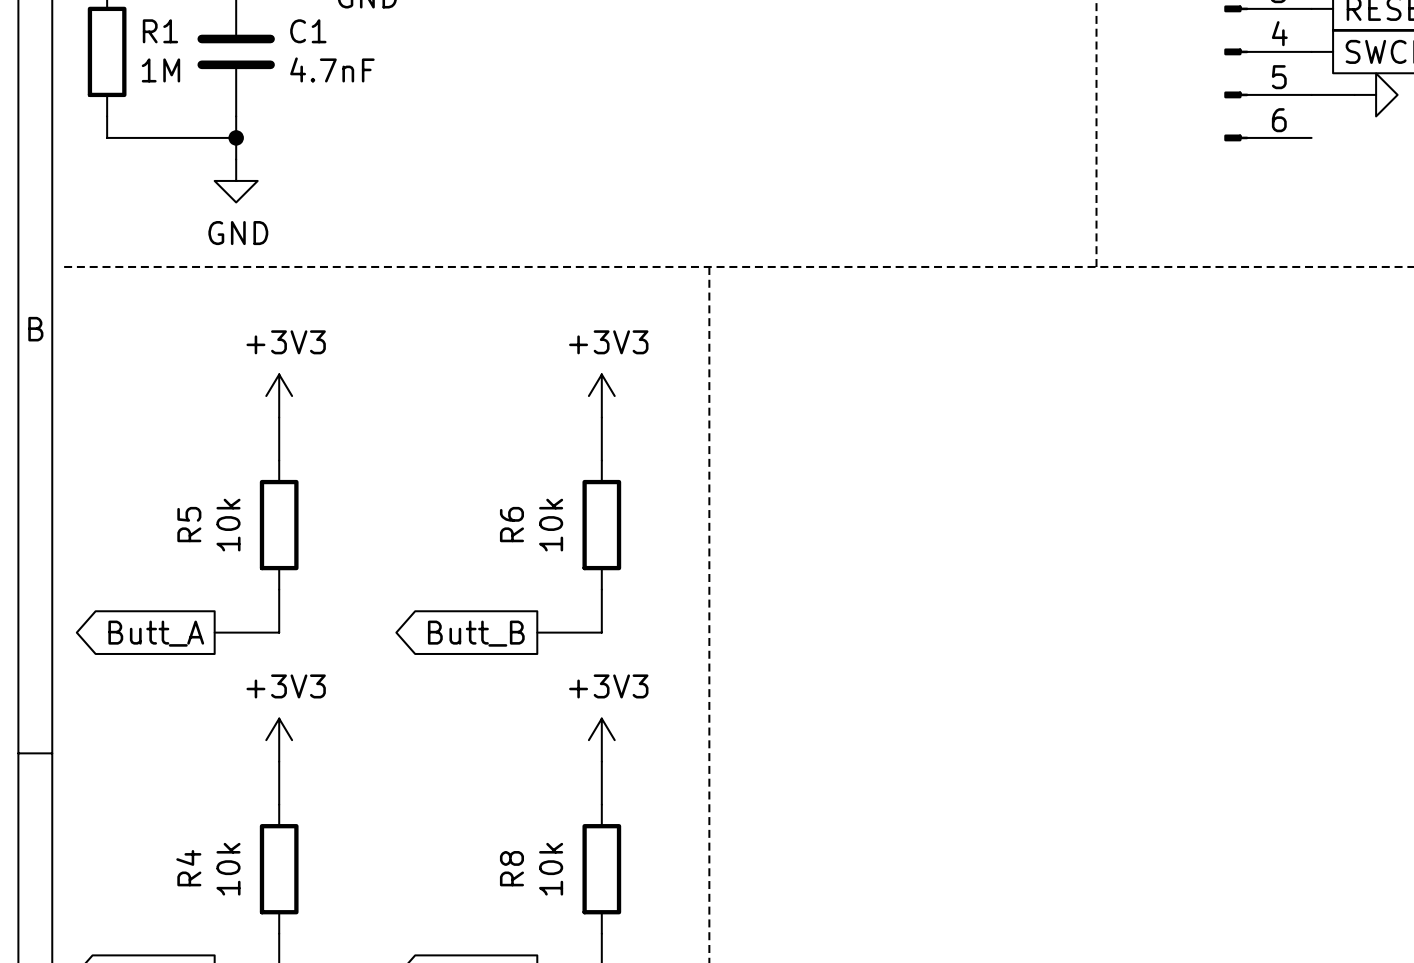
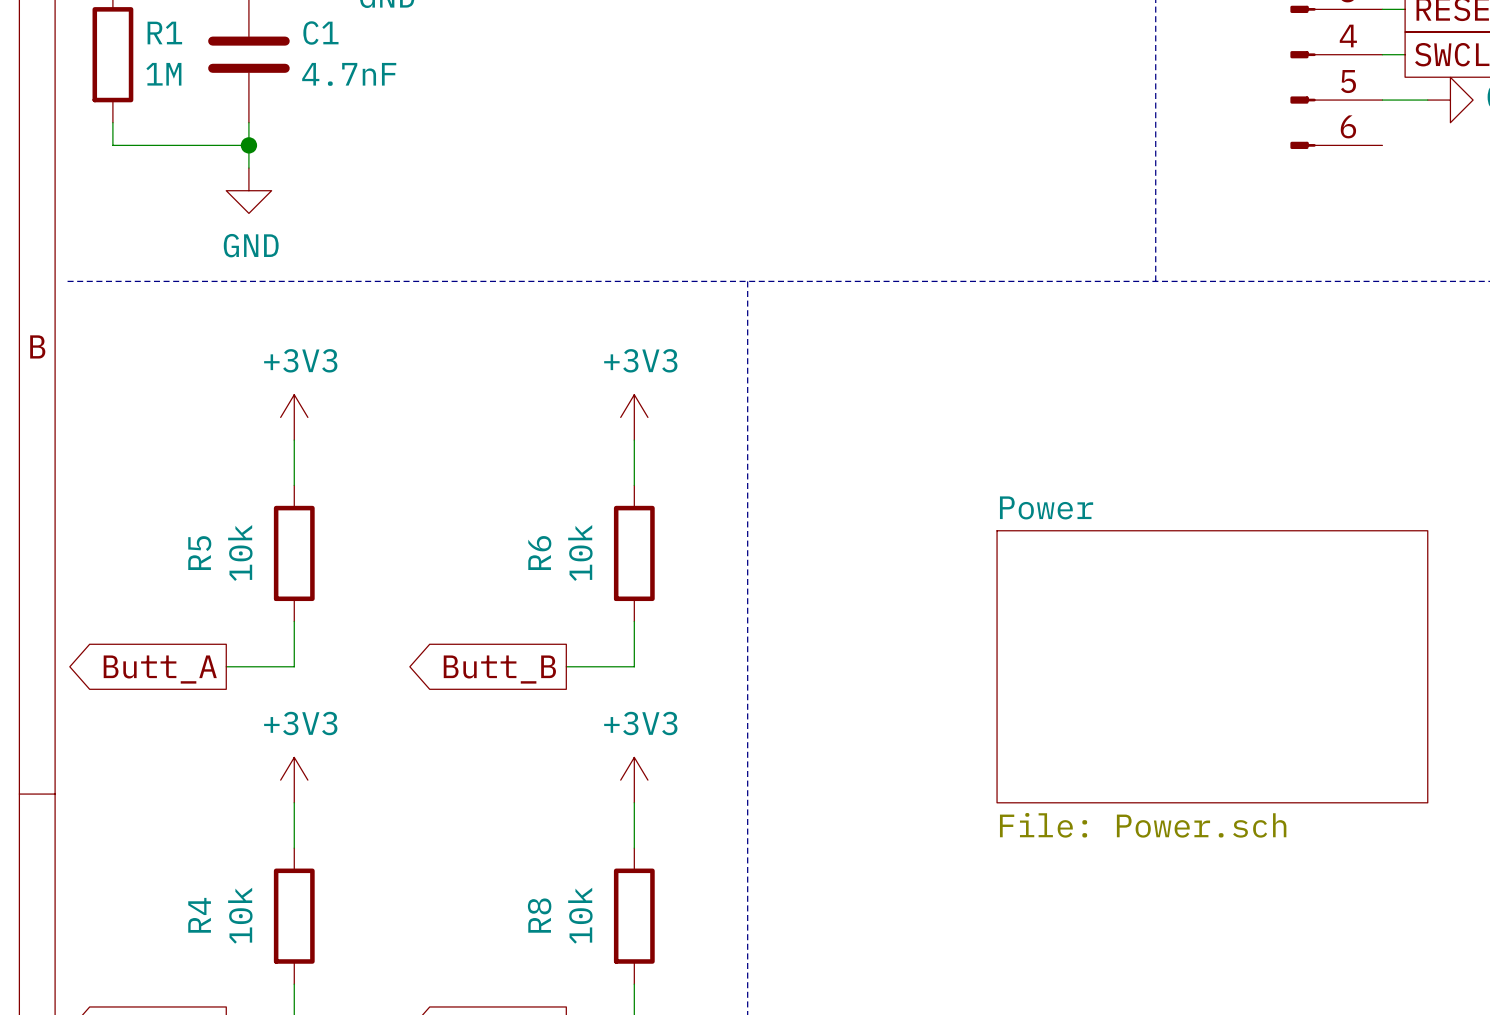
sheet Power: none -> File: Power.sch (1212, 666)

